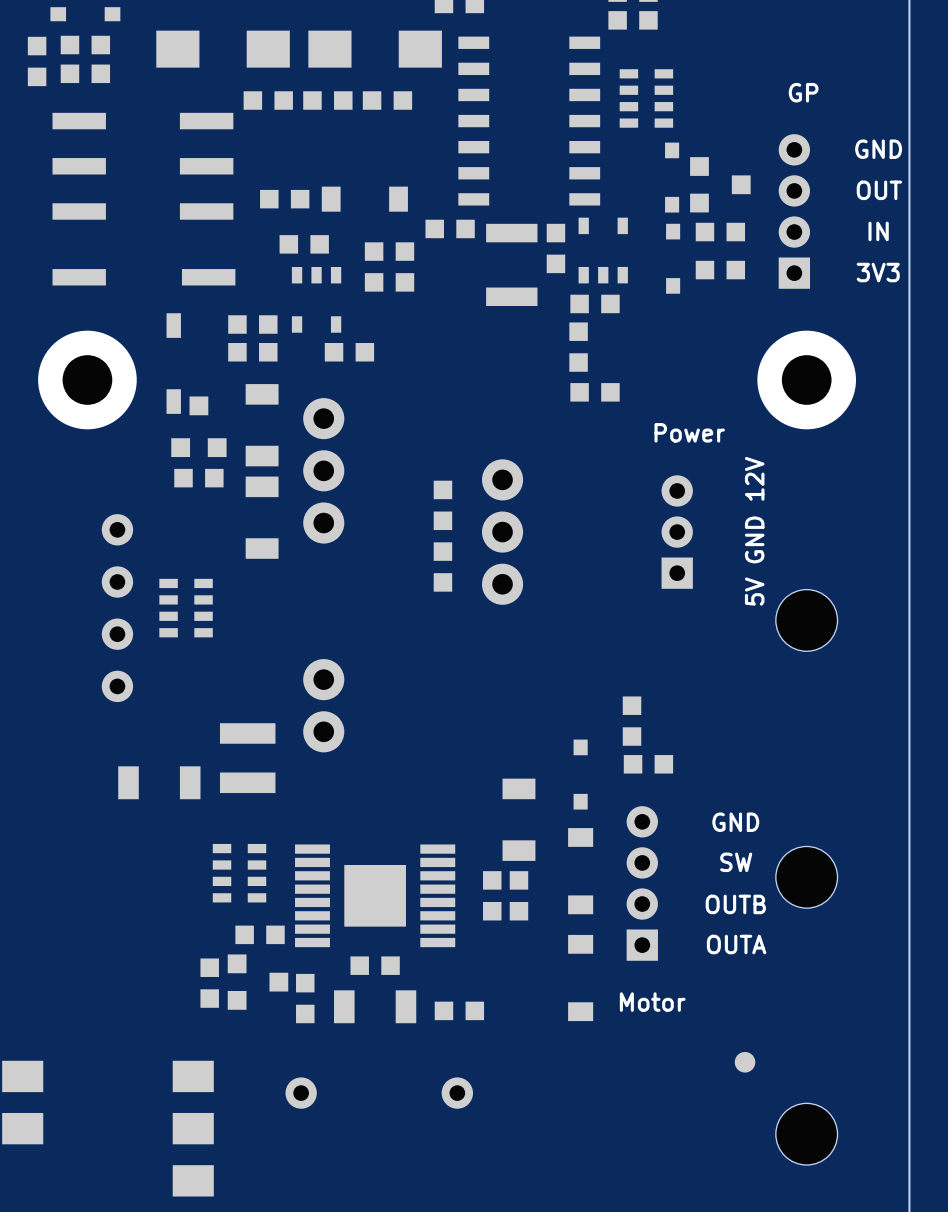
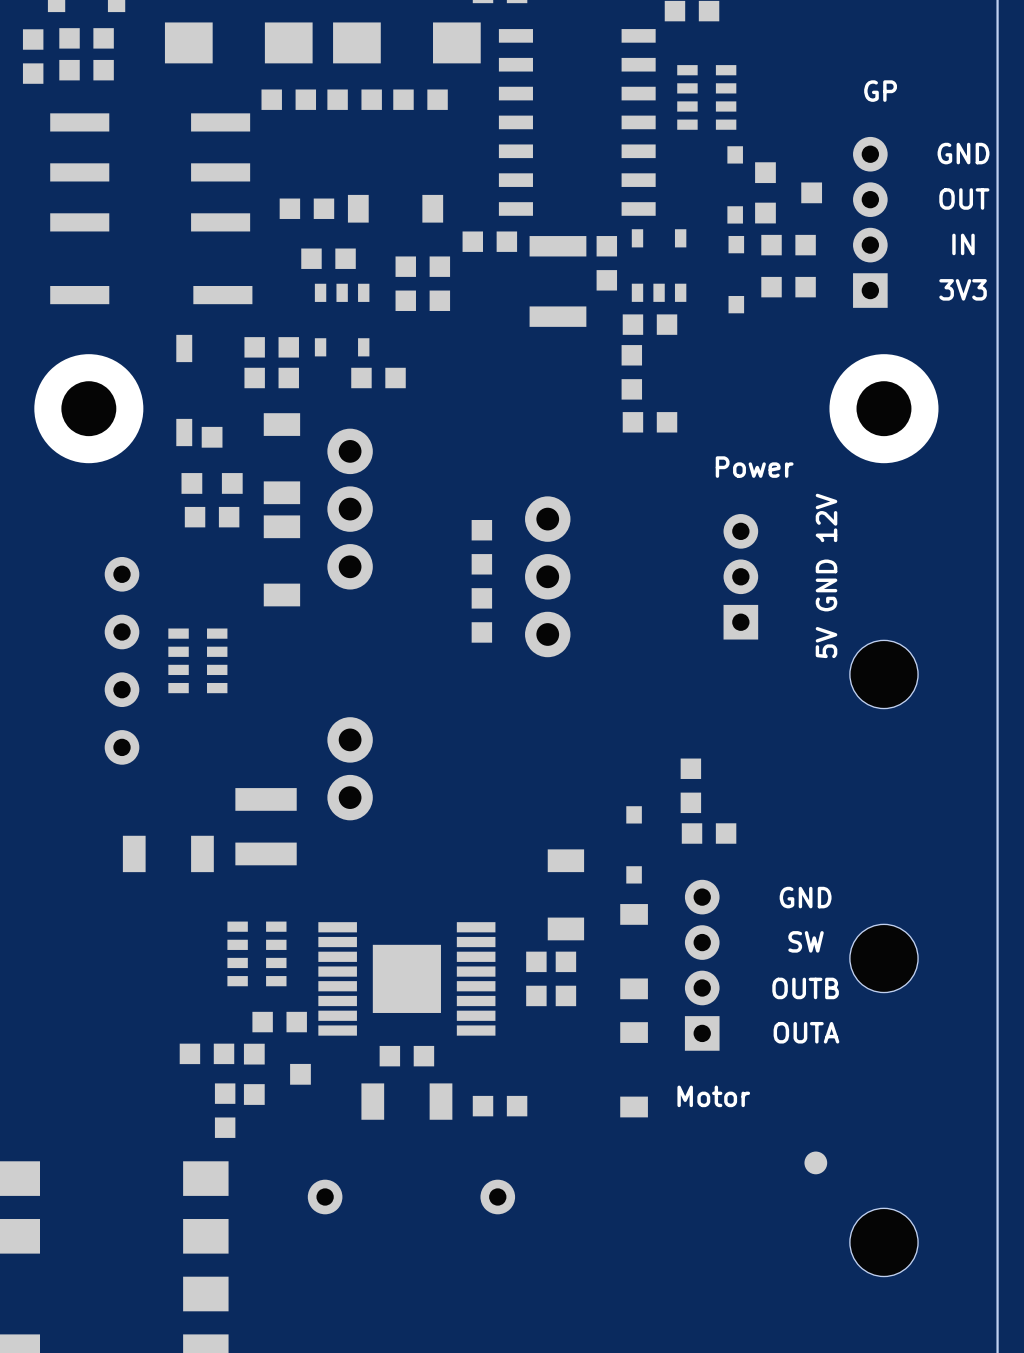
part: none -> (206, 1053)
part: (209, 983) -> none
part: (305, 998) -> none
part: none -> (225, 1110)

